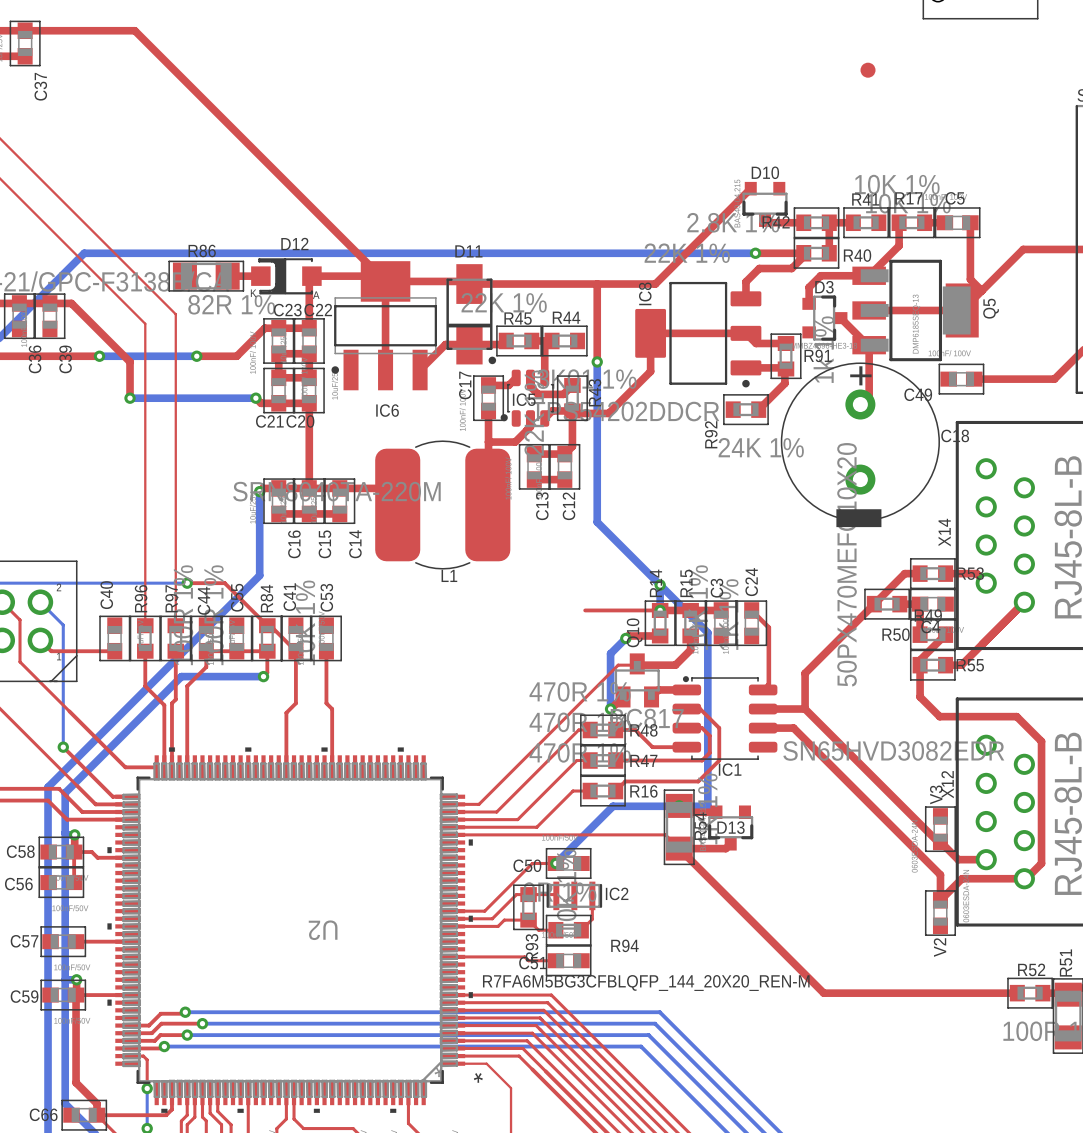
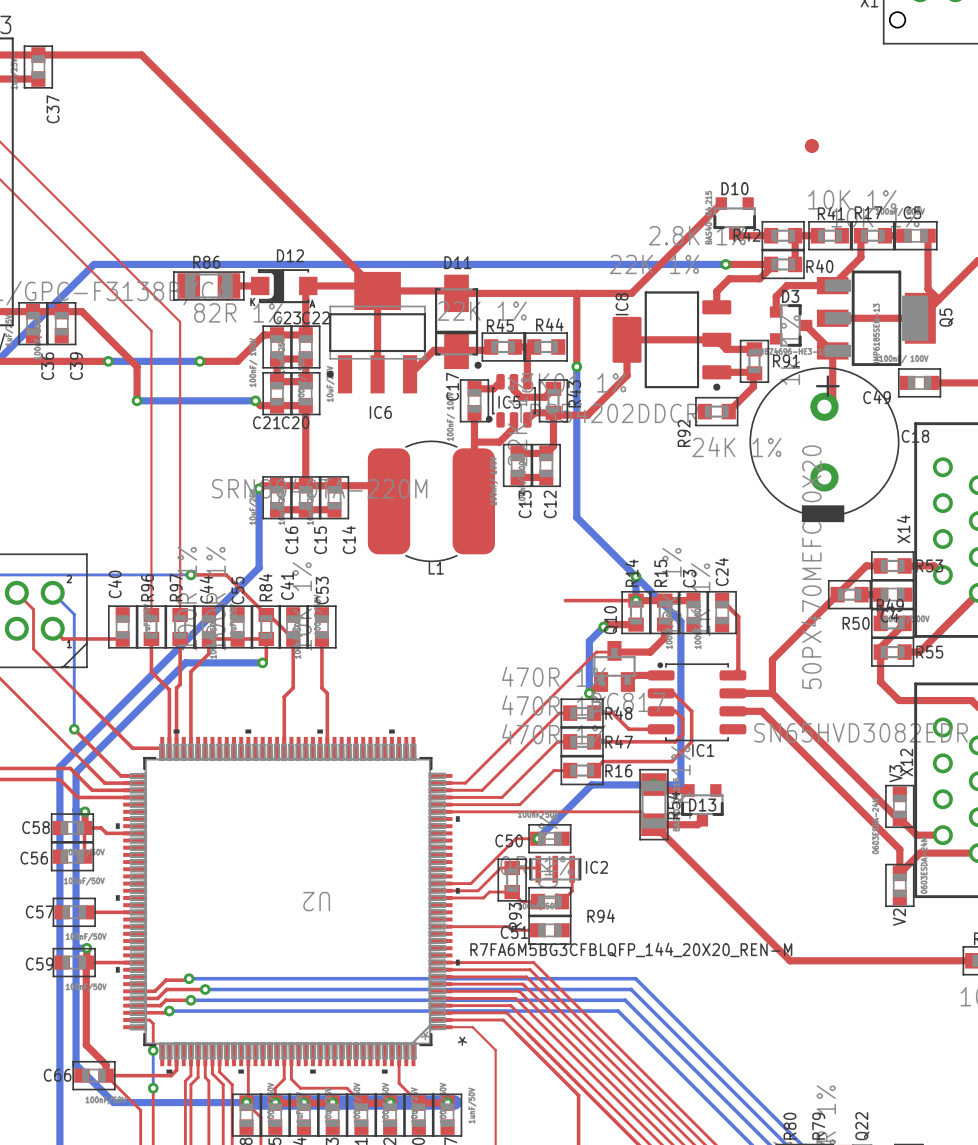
part position: (868, 70) -> (811, 145)

